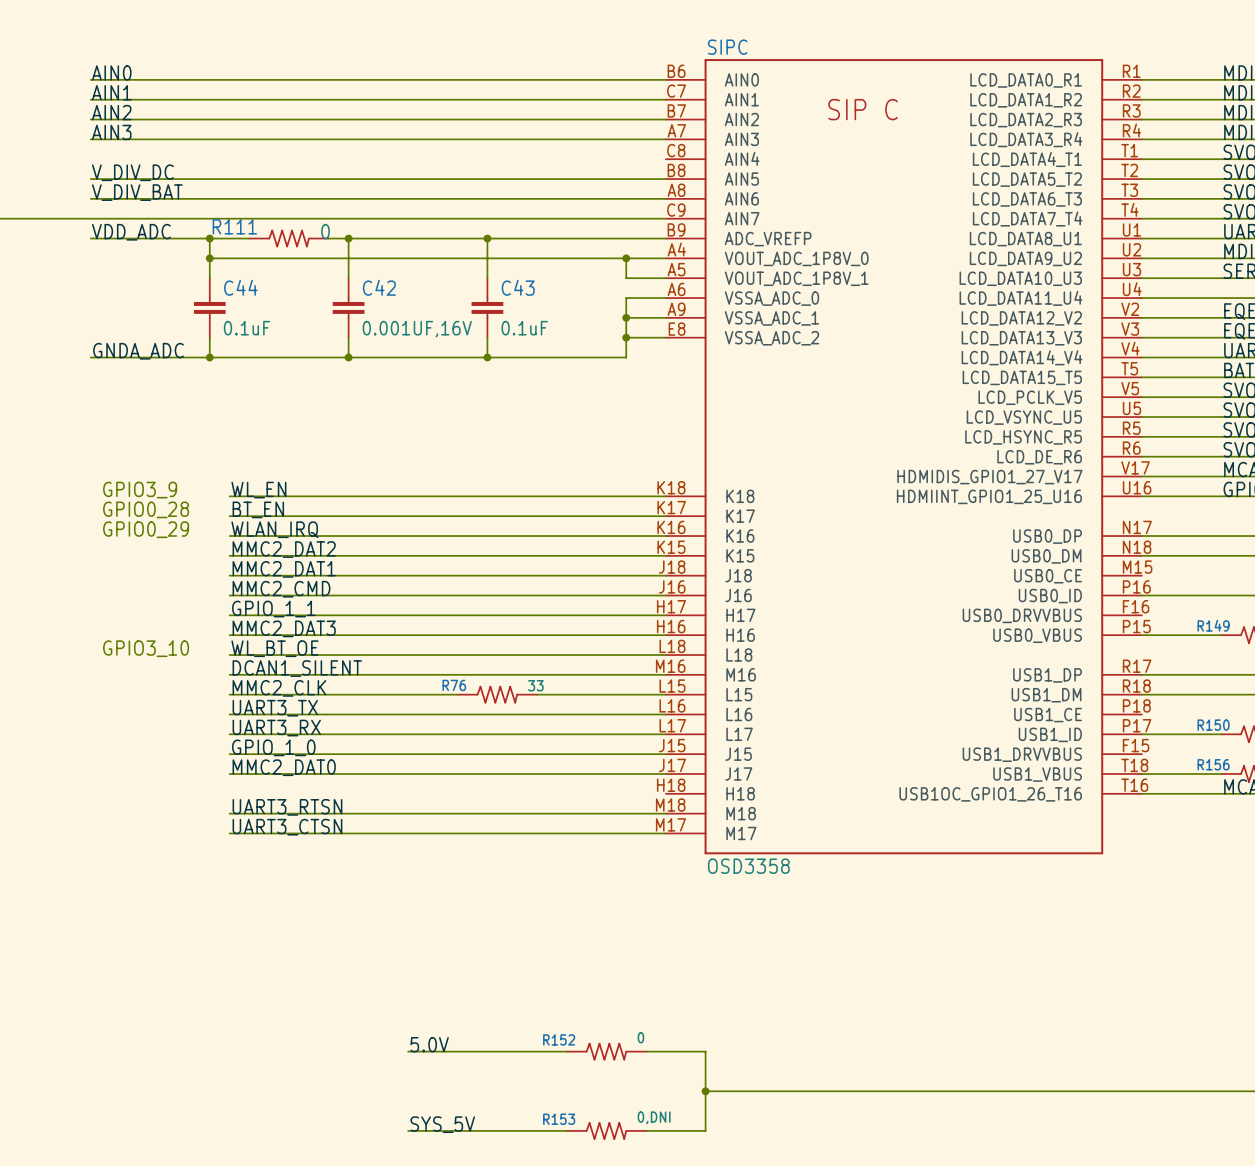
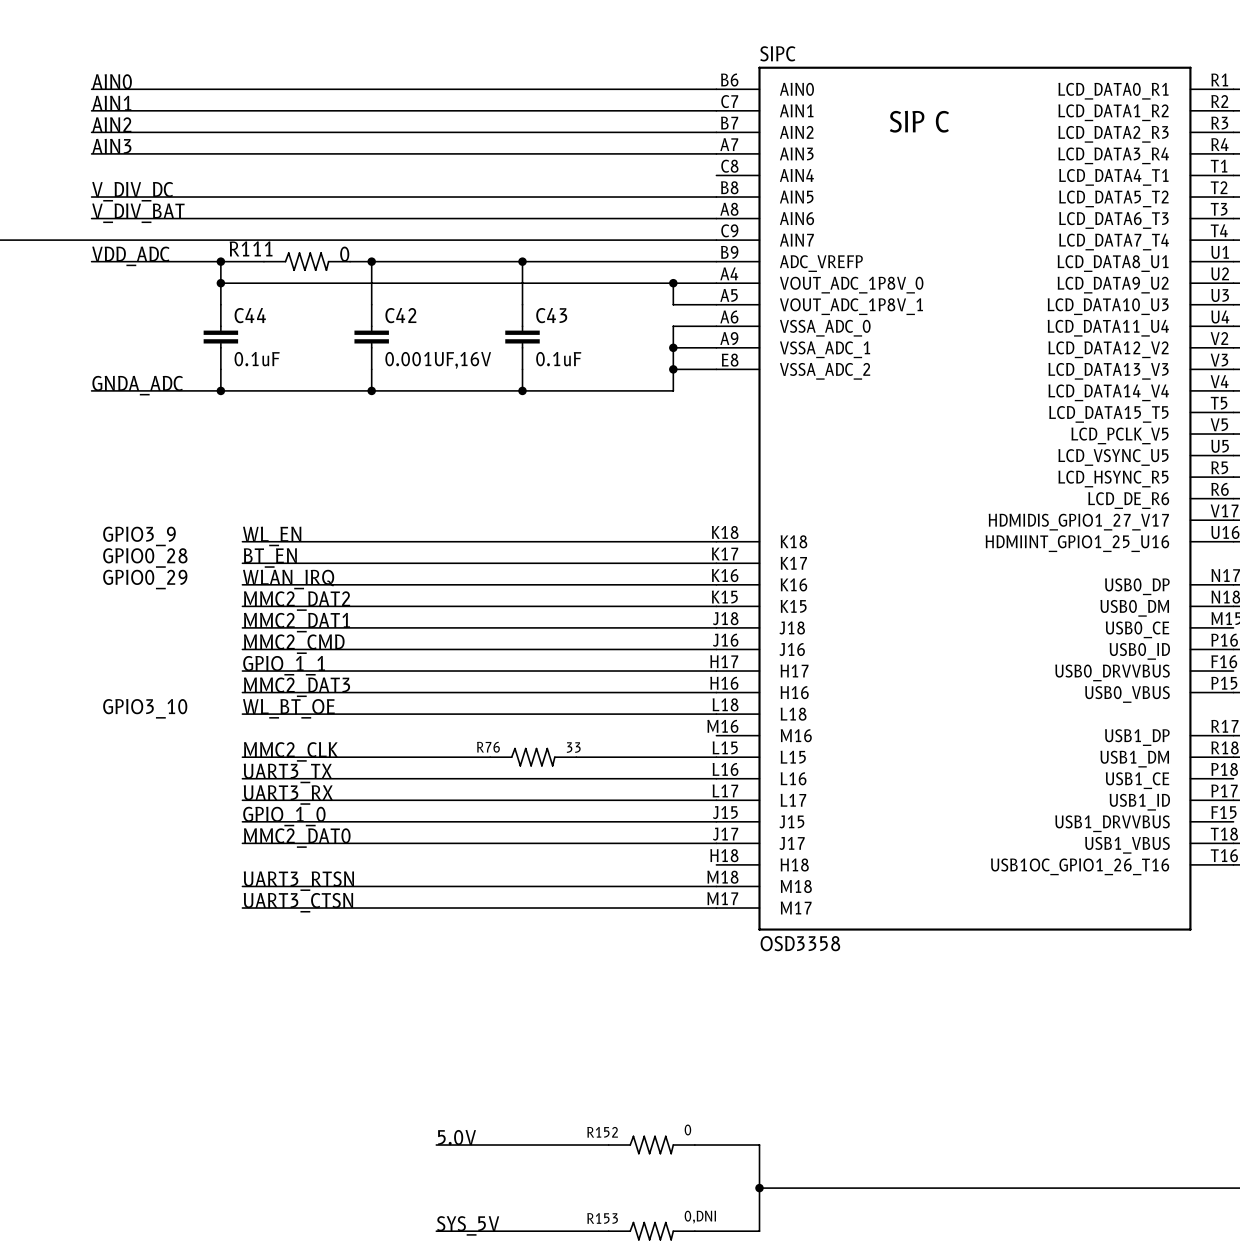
label: DCAN1_SILENT (297, 668) -> none
wire: (229, 674) (665, 674) -> none

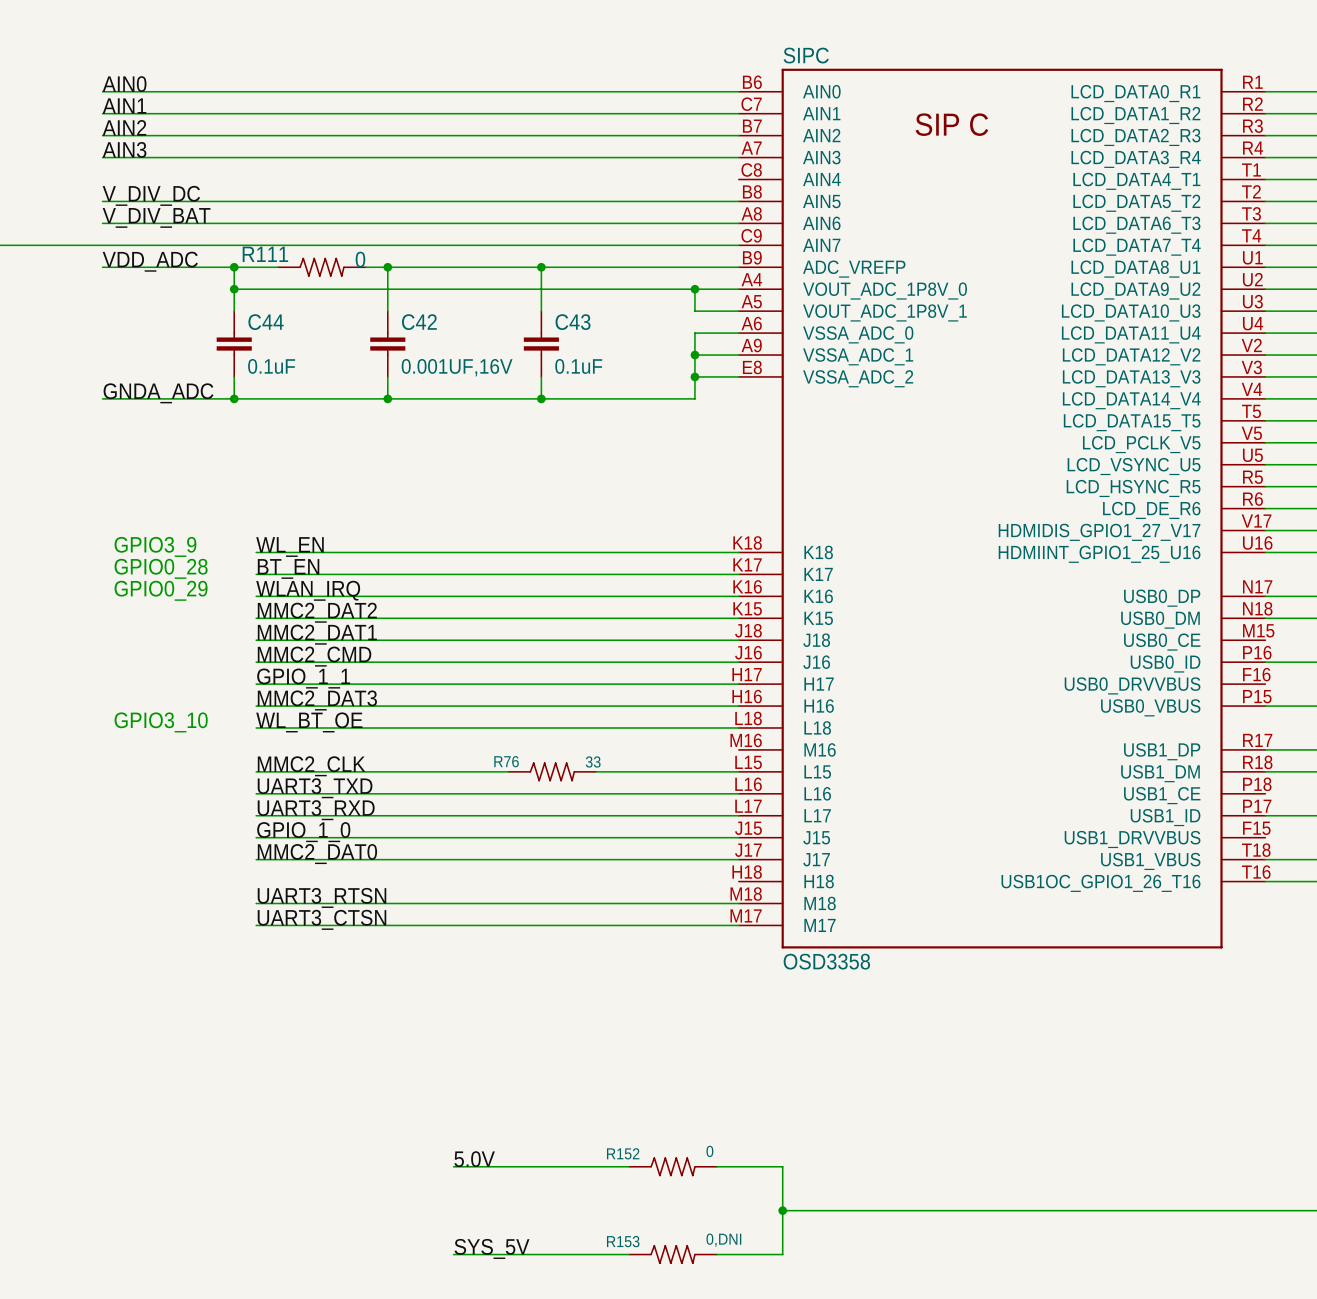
label: UART3_TX (287, 773) -> UART3_TXD (315, 788)
label: UART3_RX (288, 794) -> UART3_RXD (316, 810)

